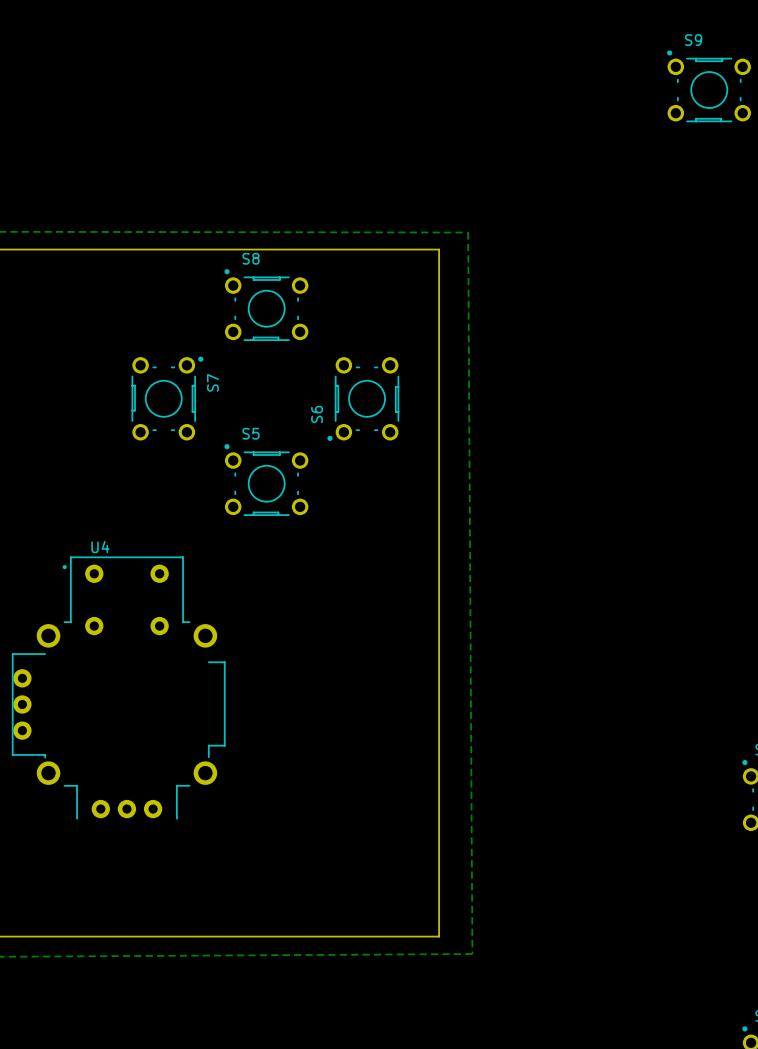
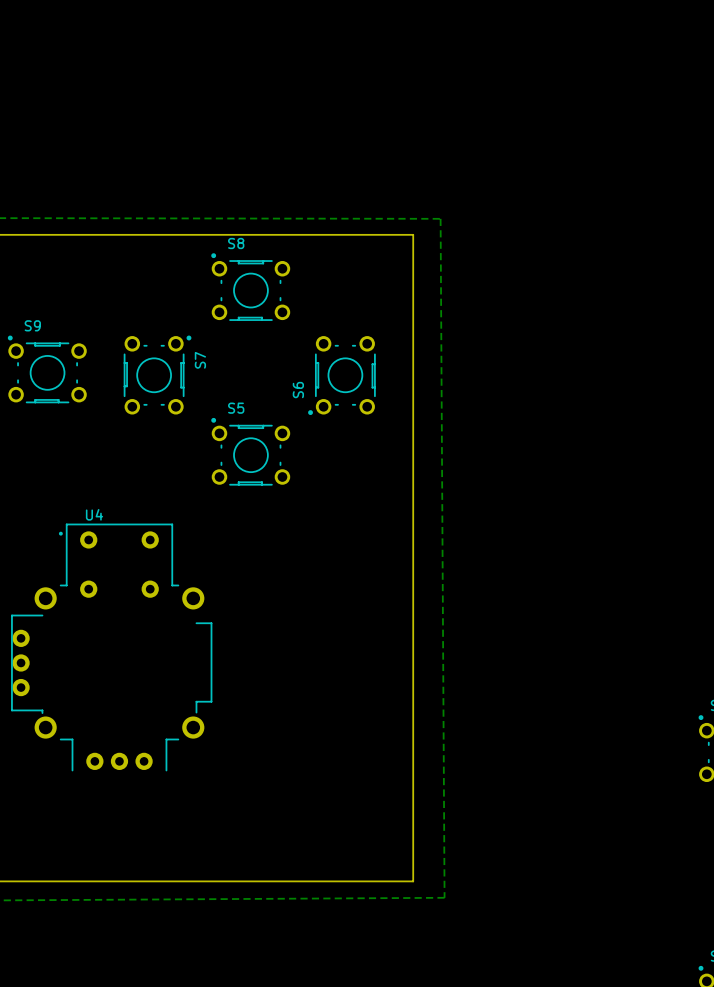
S9 position: (709, 86) -> (47, 369)

